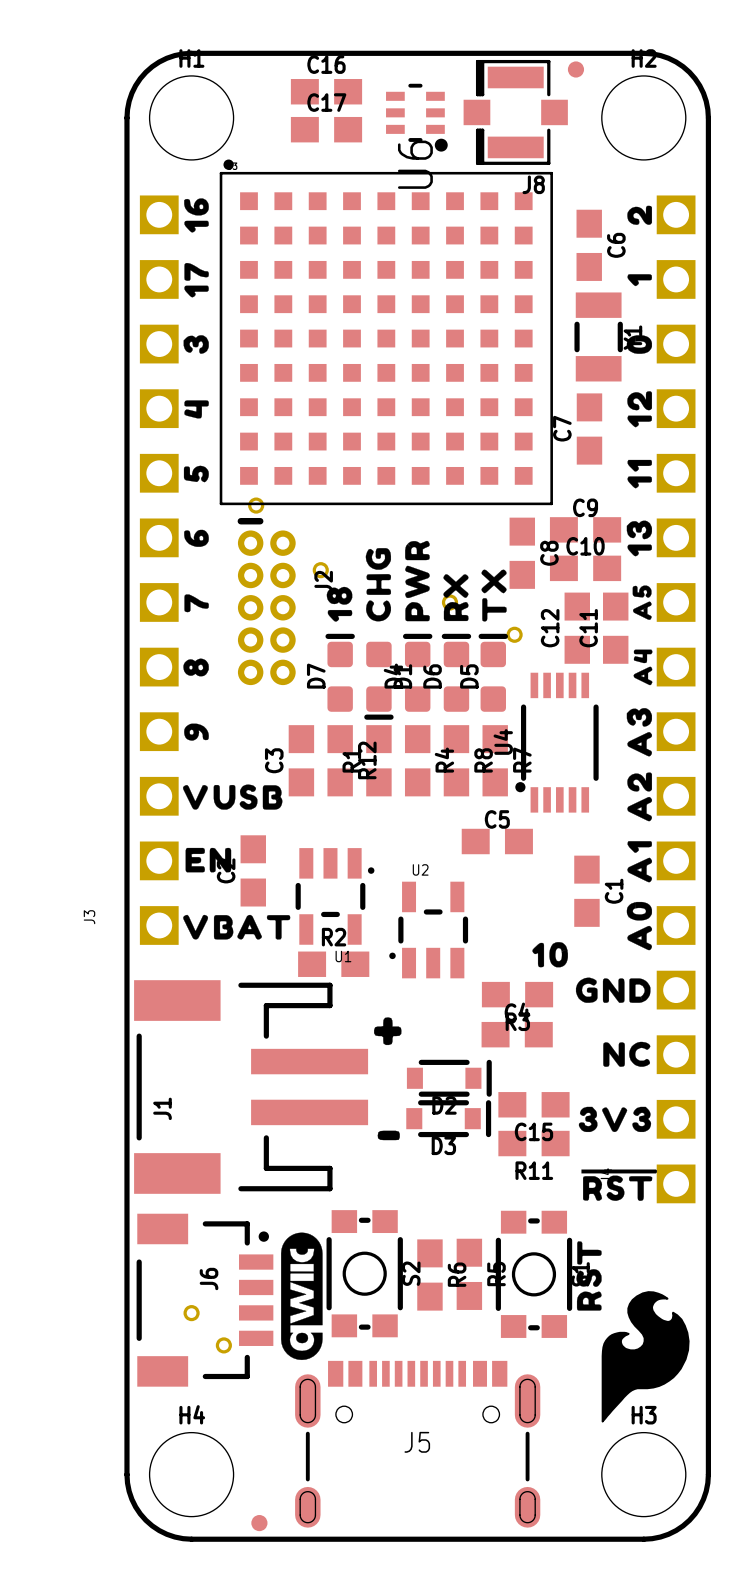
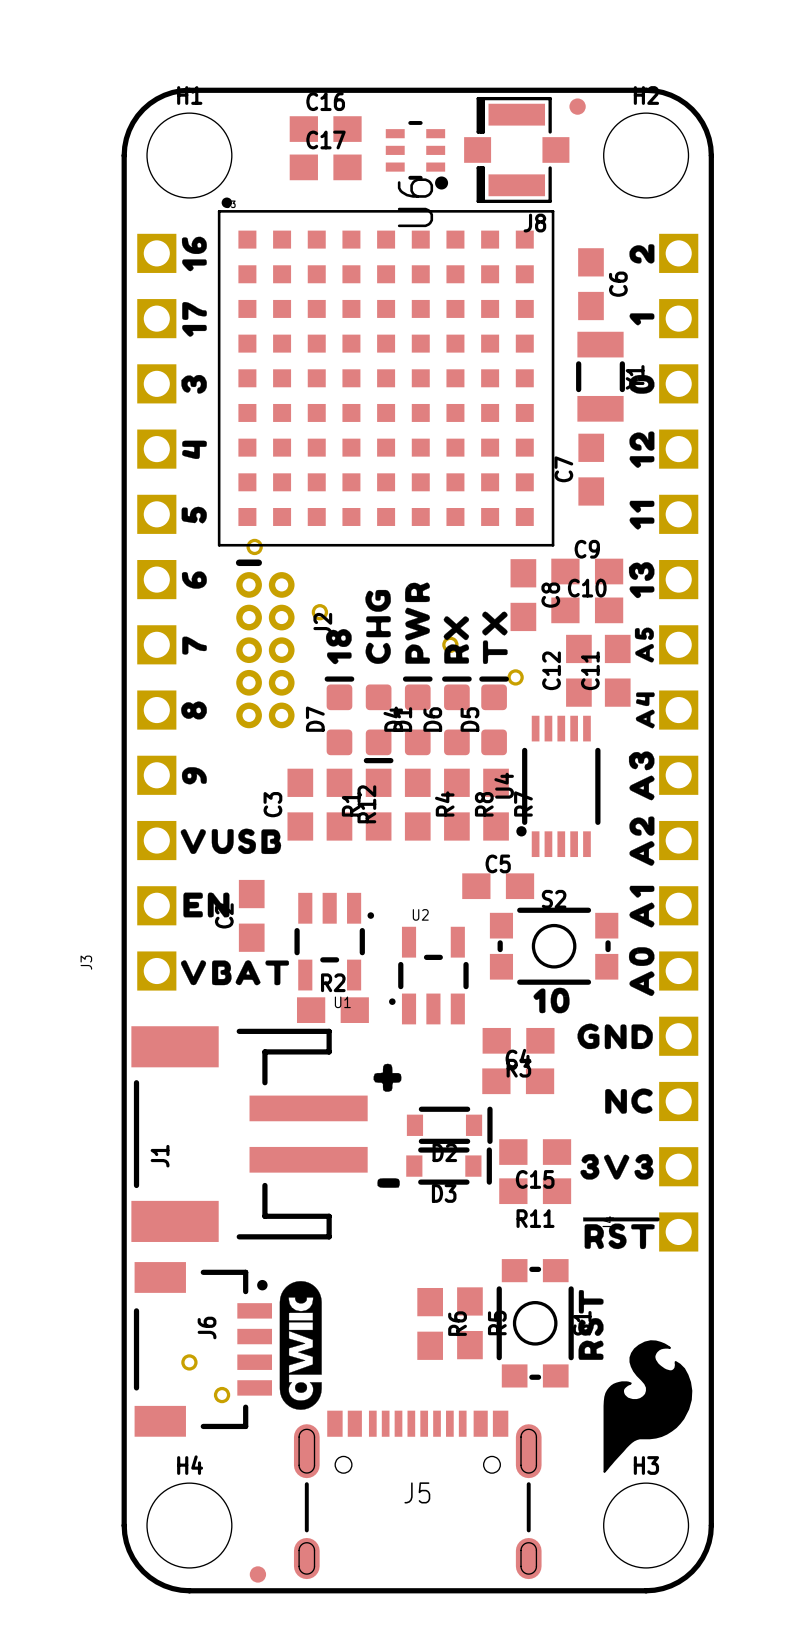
C1: (586, 891) -> none
S2 rotation: 0° (364, 1273) -> 90° clockwise (554, 946)
S2 position: (364, 1273) -> (554, 946)
S2 name position: S2 (411, 1273) -> S2 (554, 899)

